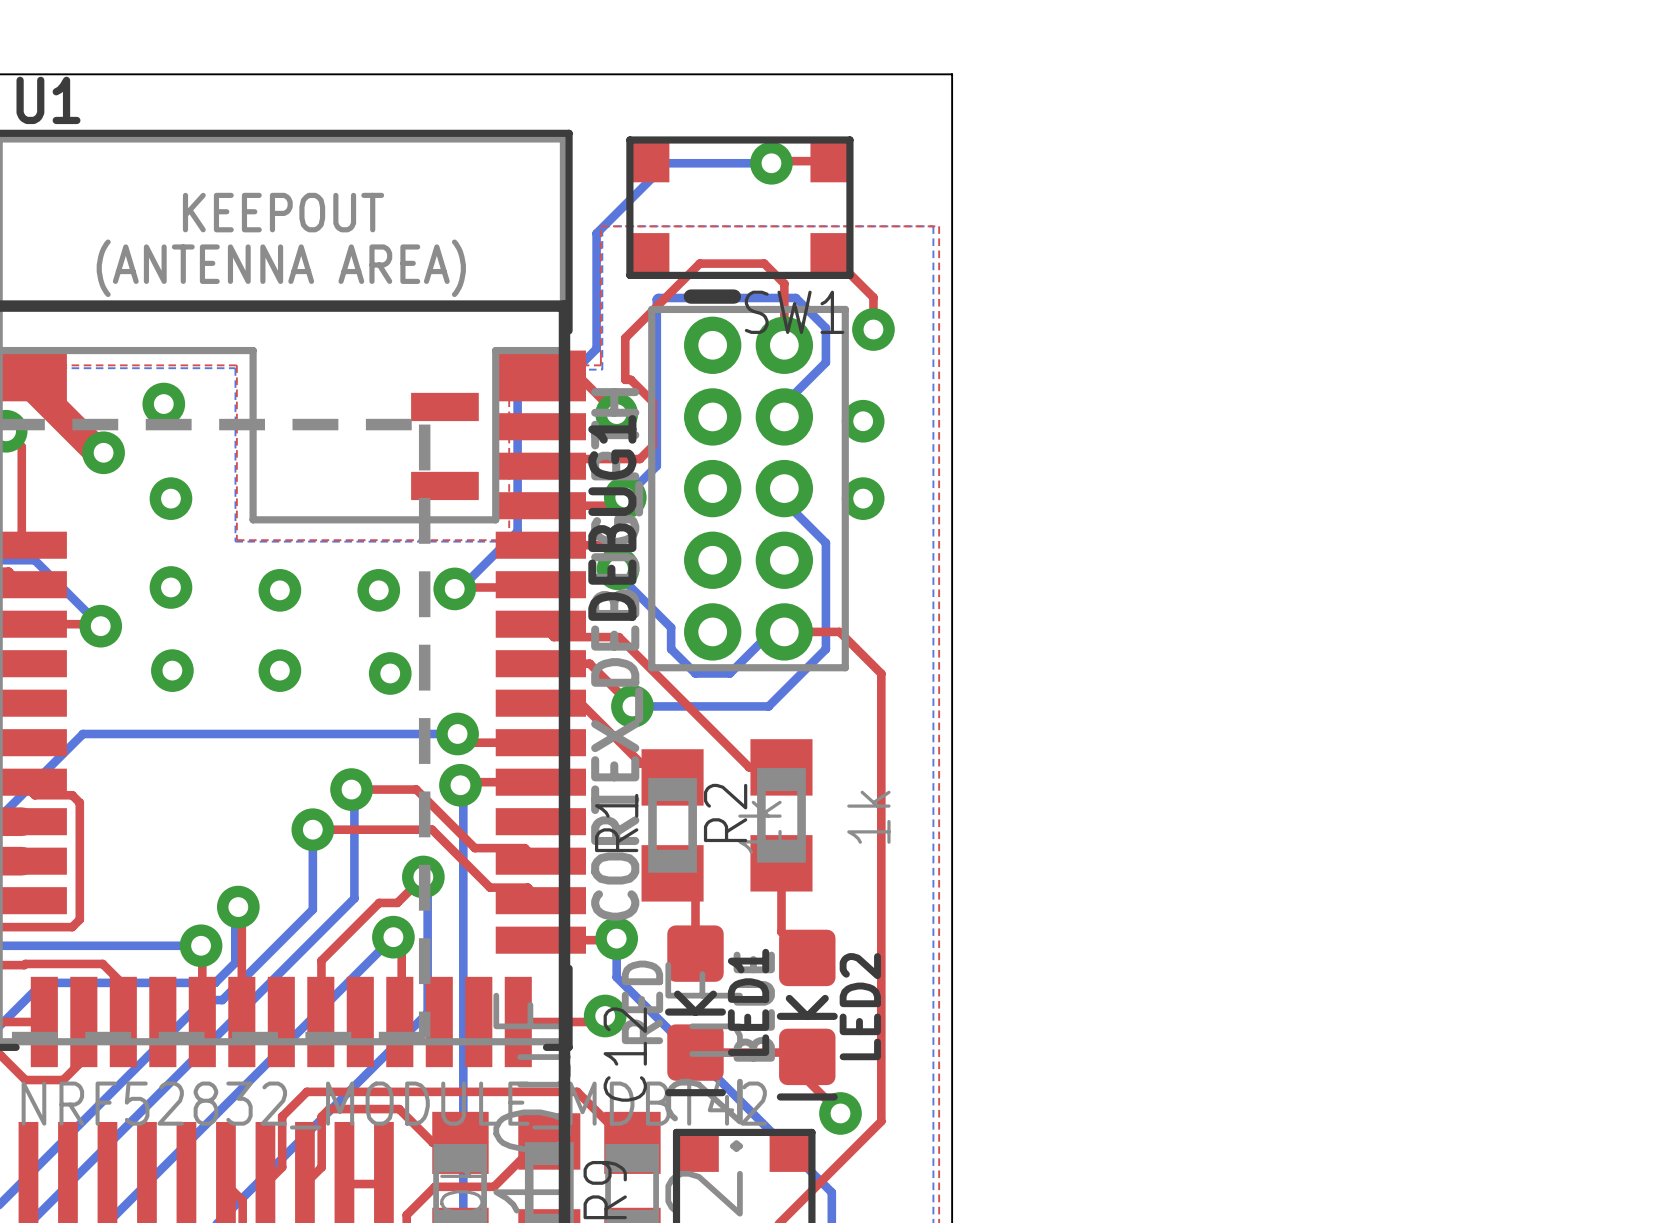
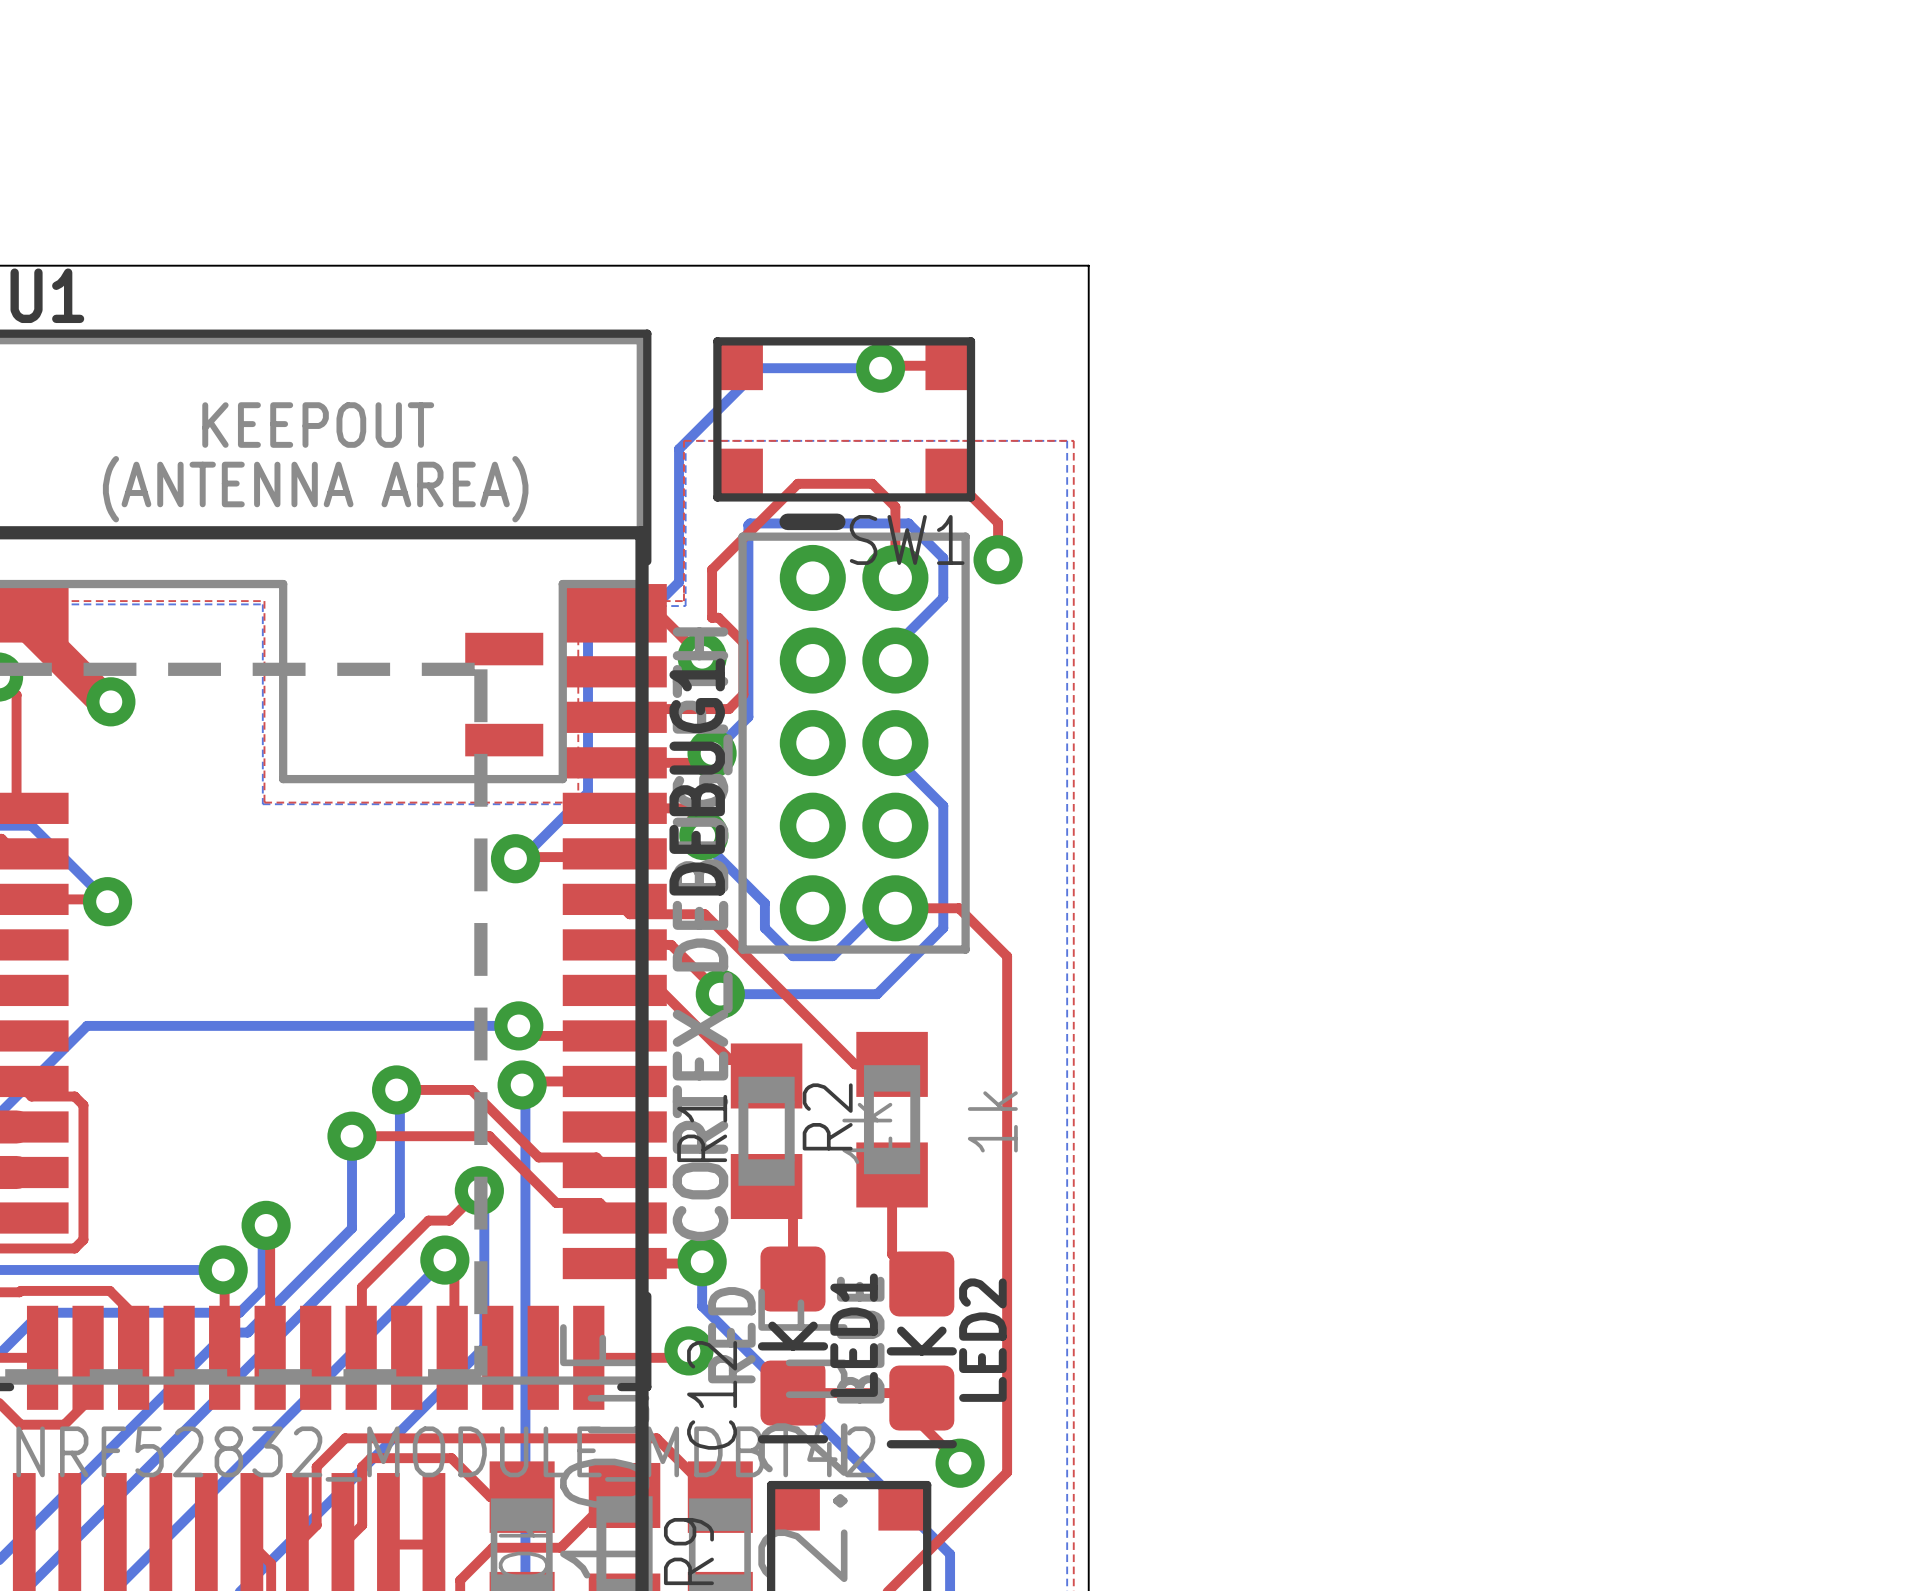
via: (163, 404) -> none
via: (863, 421) -> none
via: (170, 498) -> none
via: (863, 498) -> none
via: (170, 587) -> none
via: (279, 590) -> none
via: (378, 590) -> none
via: (172, 670) -> none
via: (279, 670) -> none
via: (390, 673) -> none

